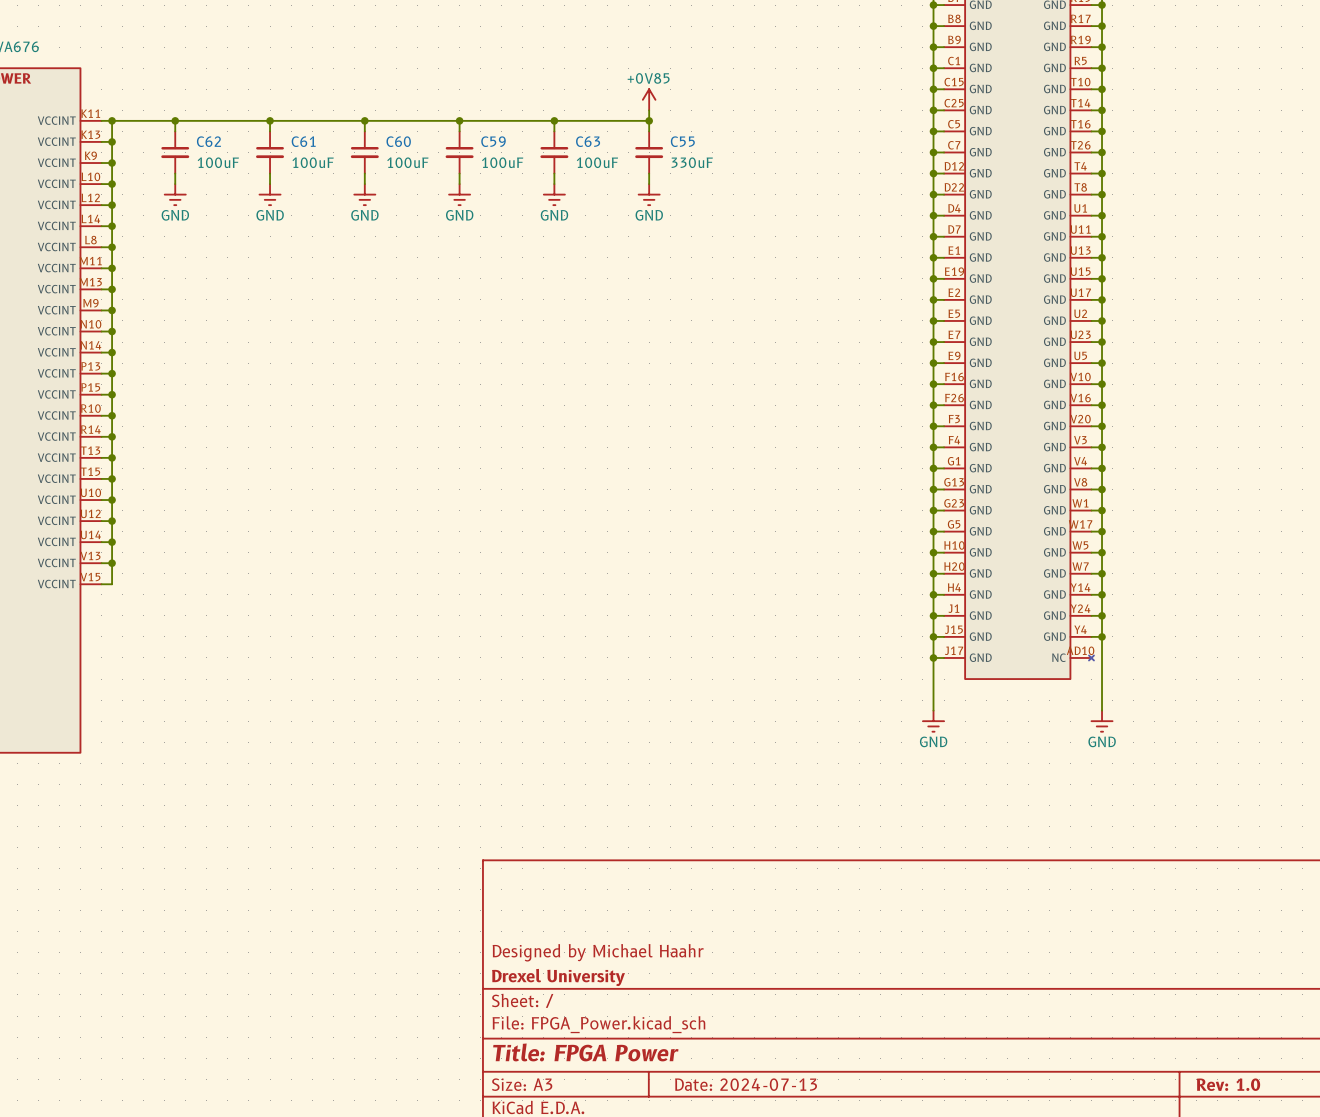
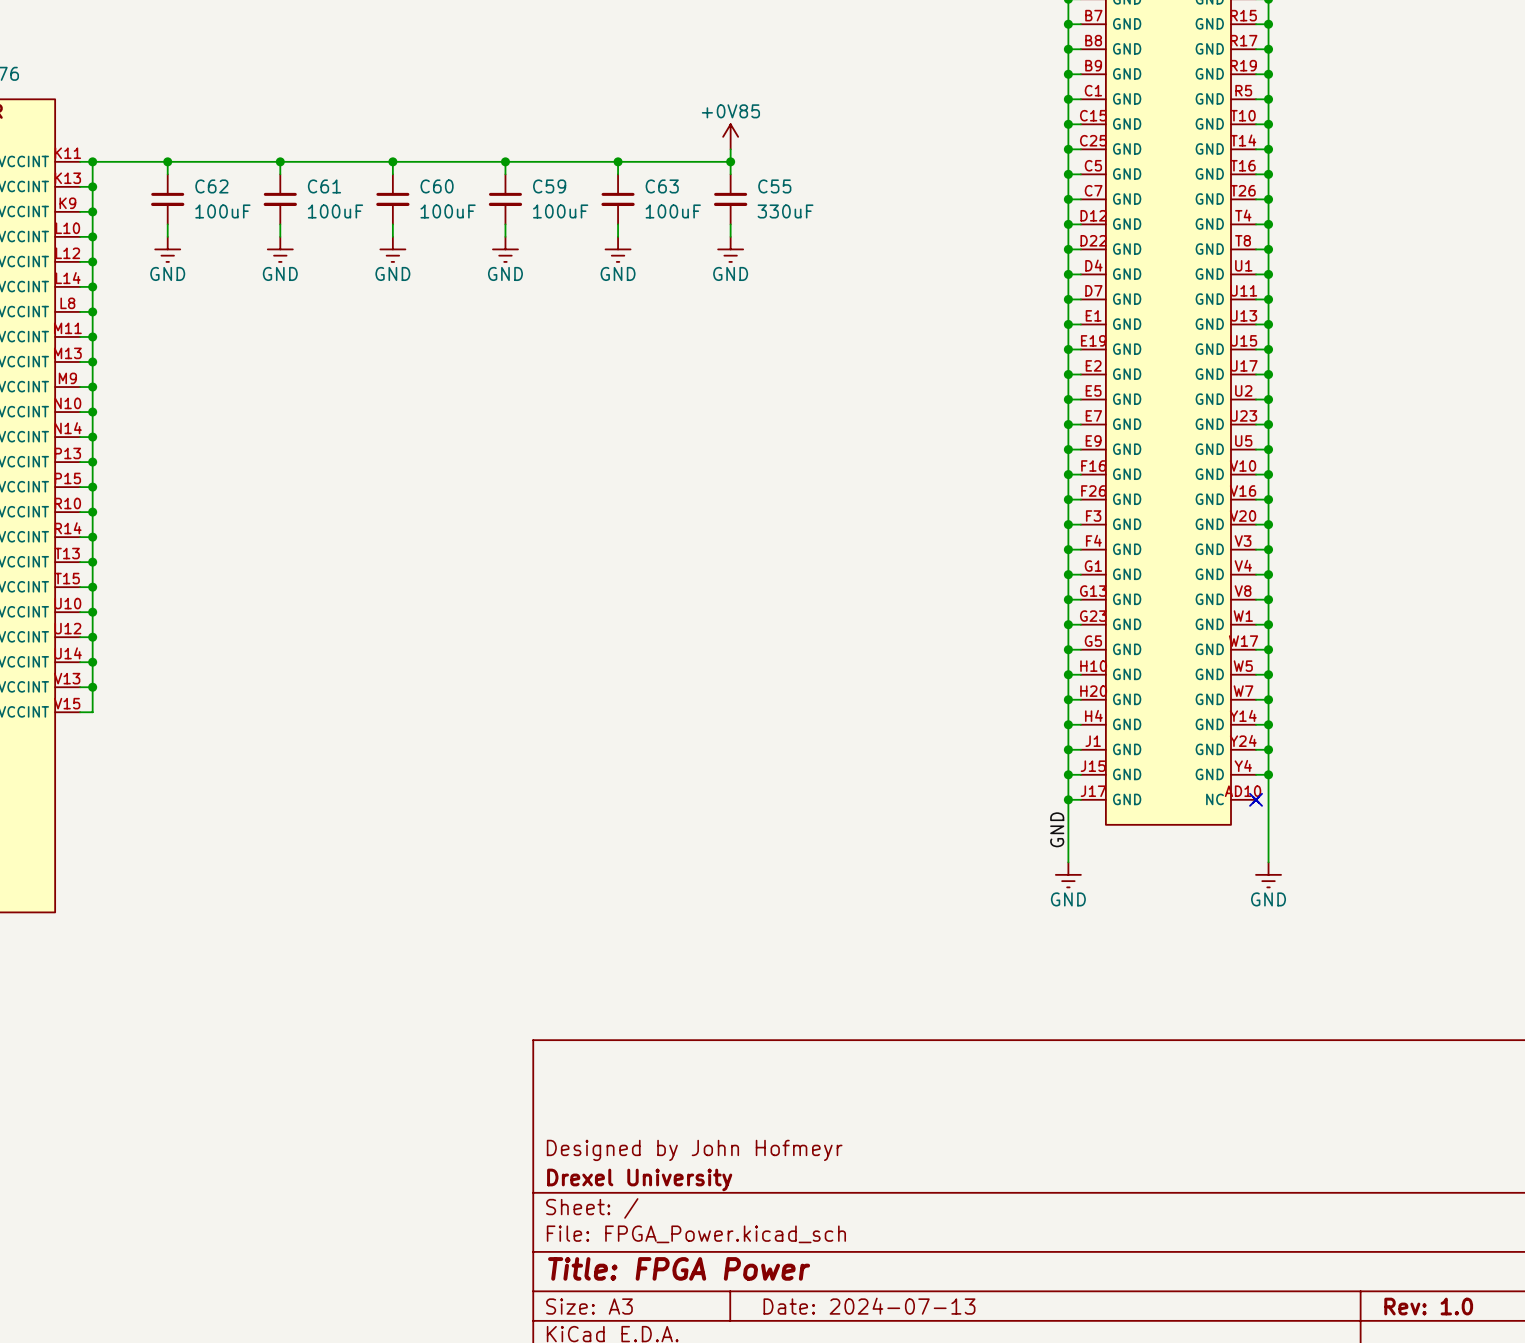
no-connect mark: none -> (1256, 799)
label: none -> GND (1057, 829)
title block: Designed by Michael Haahr (598, 952) -> Designed by John Hofmeyr (694, 1150)

